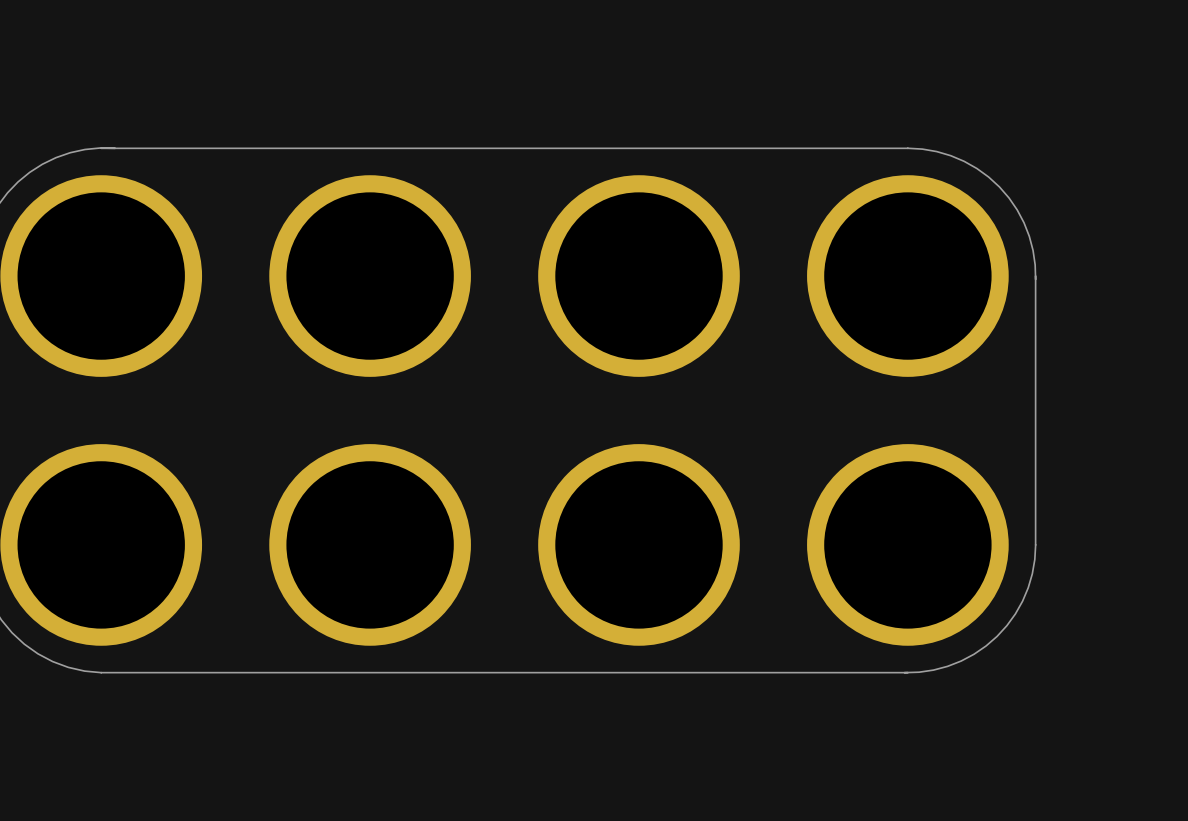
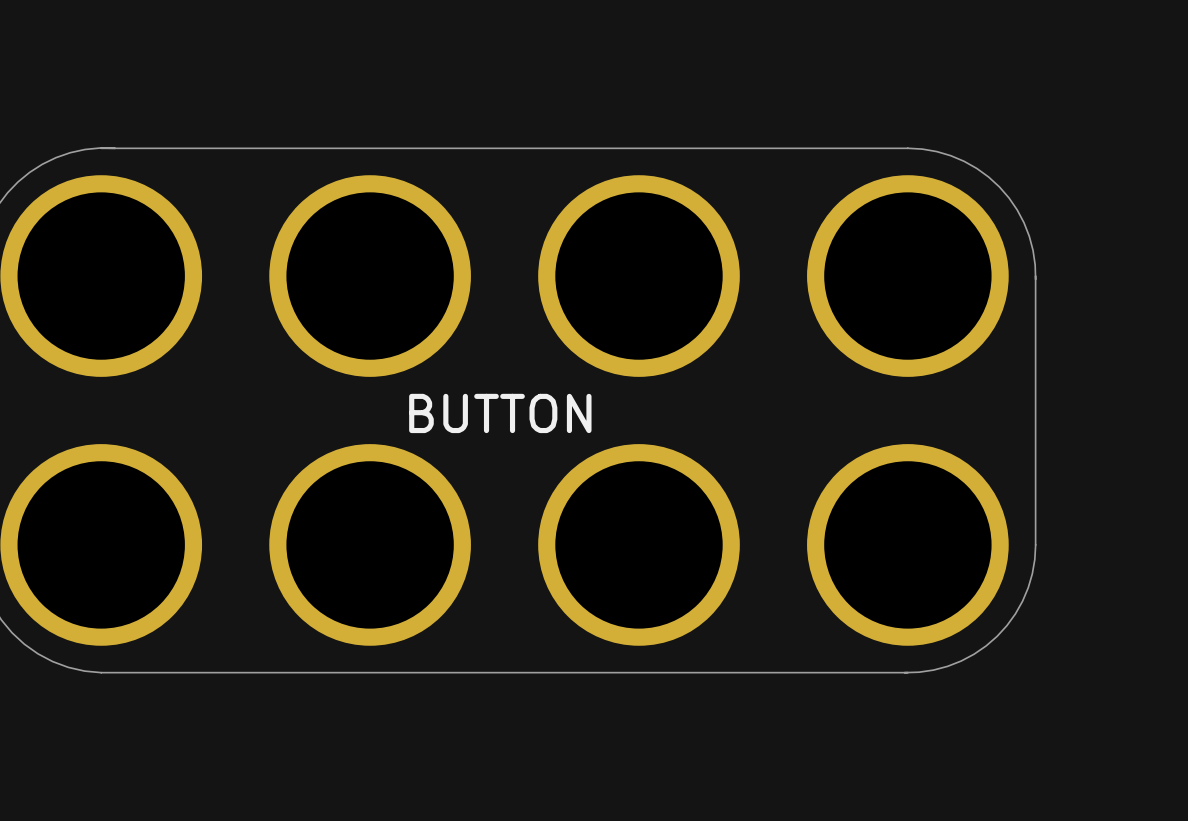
text: none -> BUTTON (500, 413)

